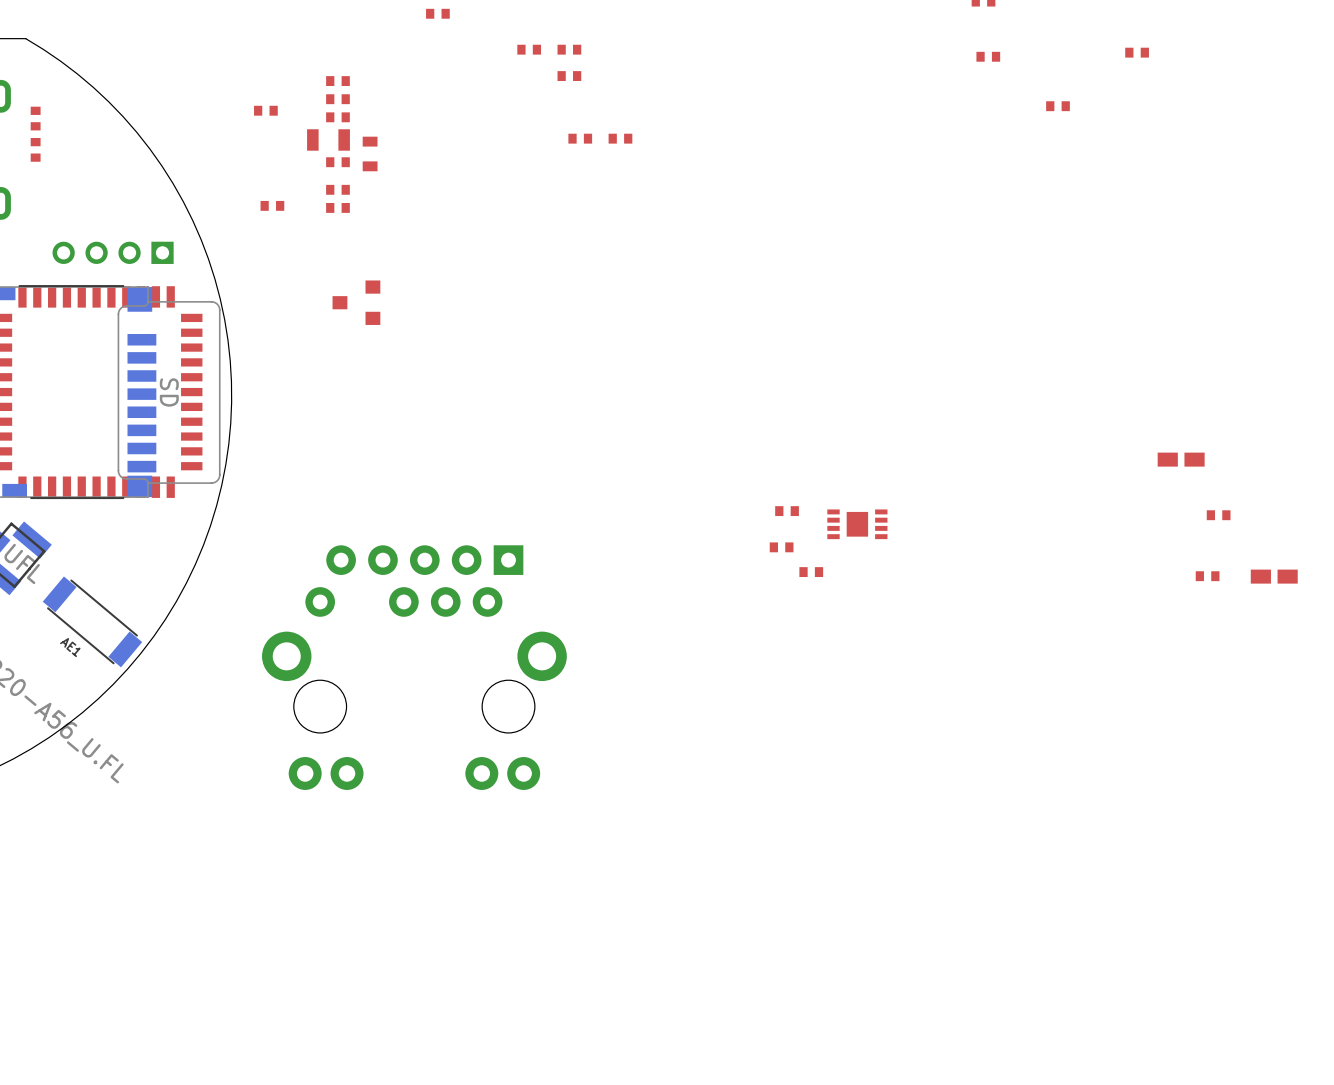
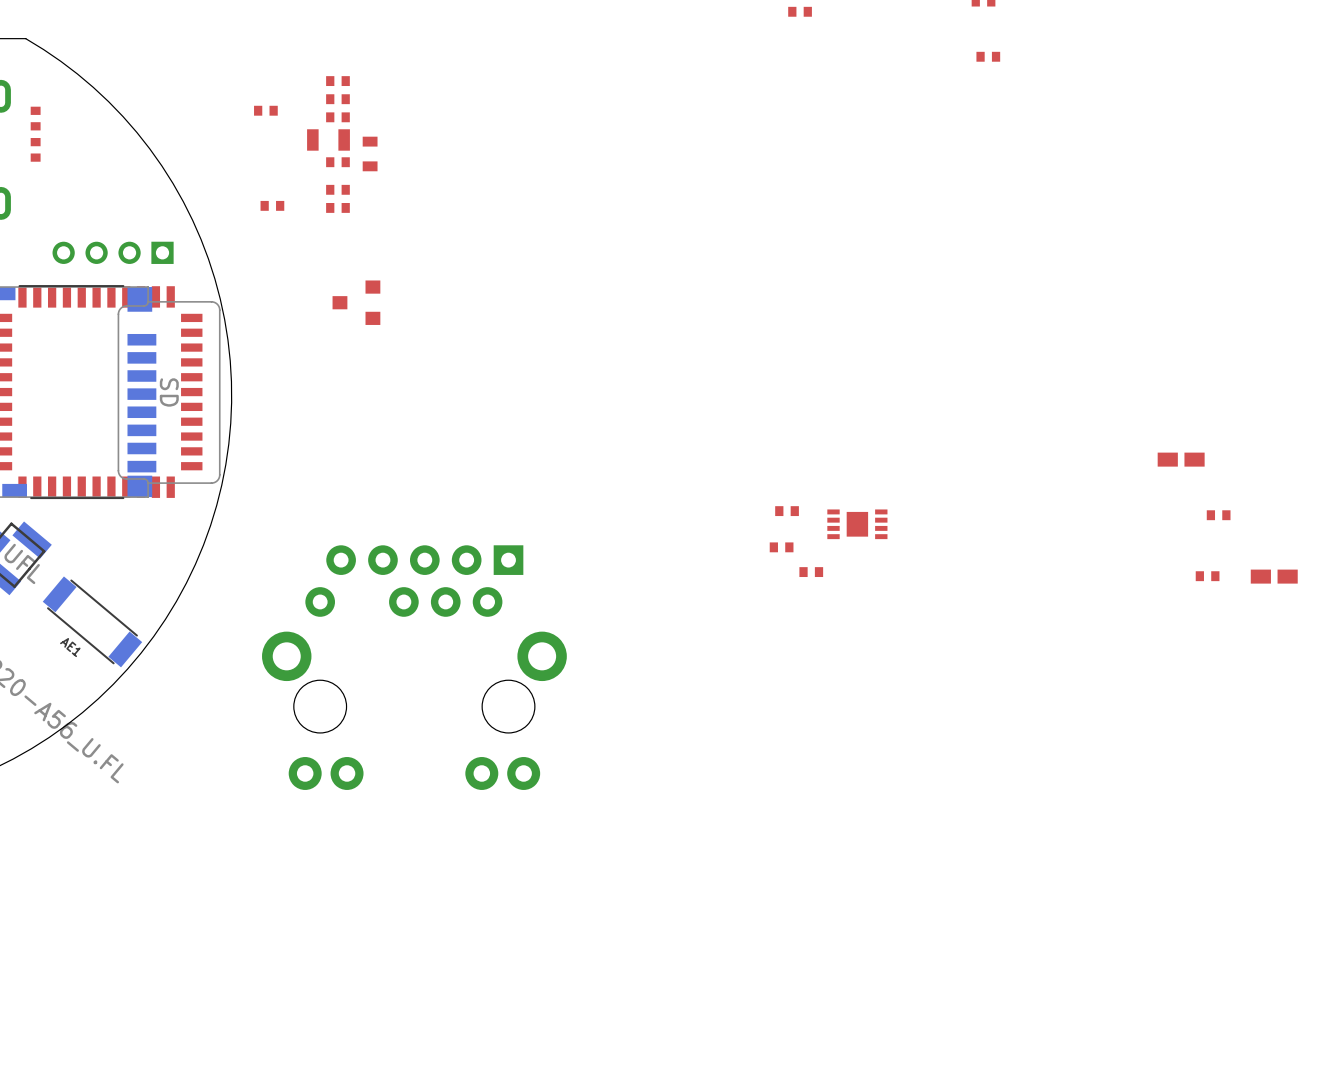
part: none -> (800, 11)
part: (437, 13) -> none
part: (529, 49) -> none
part: (569, 49) -> none
part: (1137, 52) -> none
part: (569, 76) -> none
part: (1057, 106) -> none
part: (580, 138) -> none
part: (620, 138) -> none

